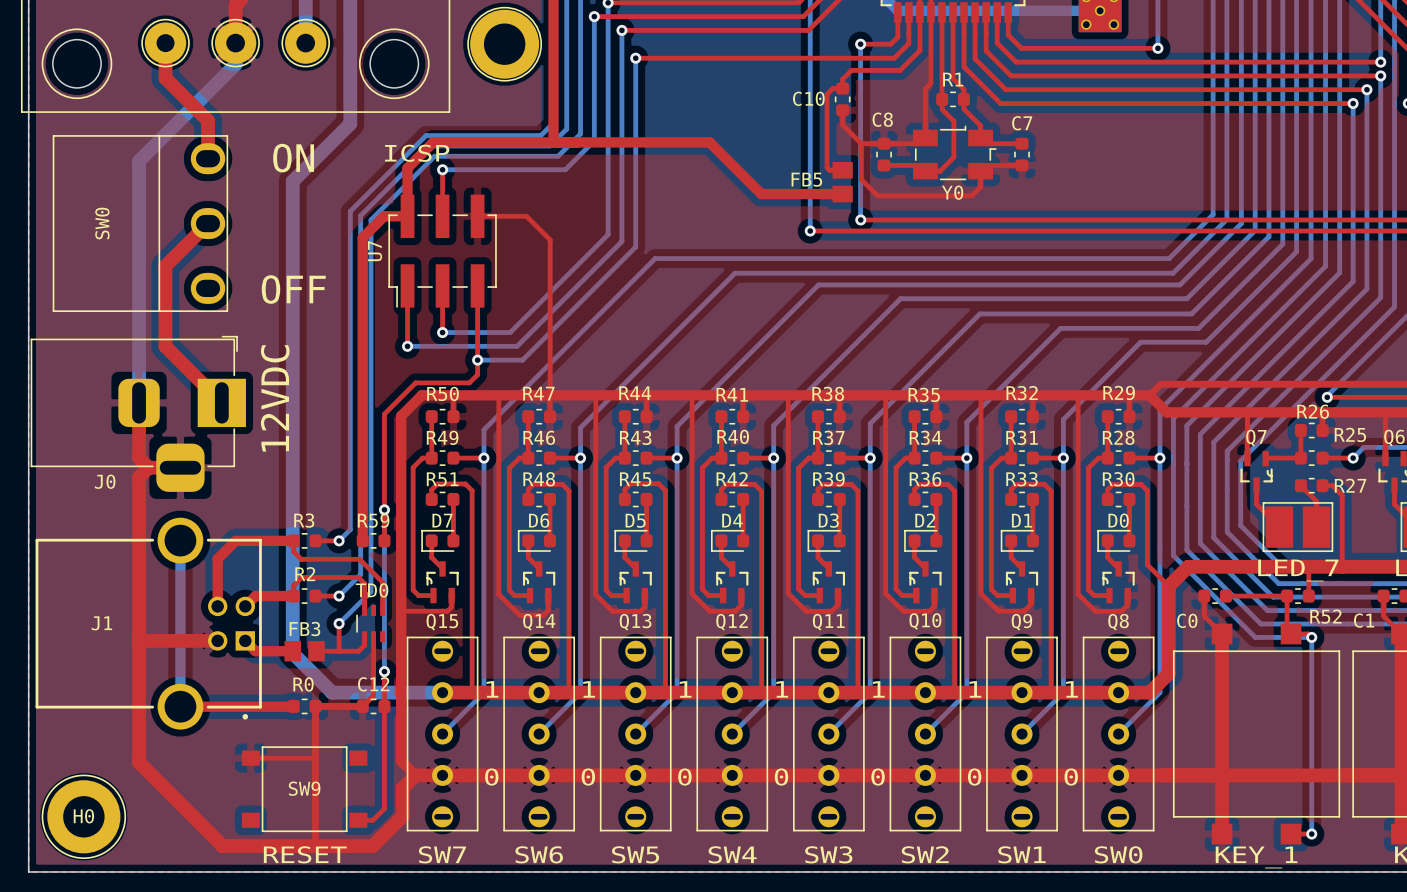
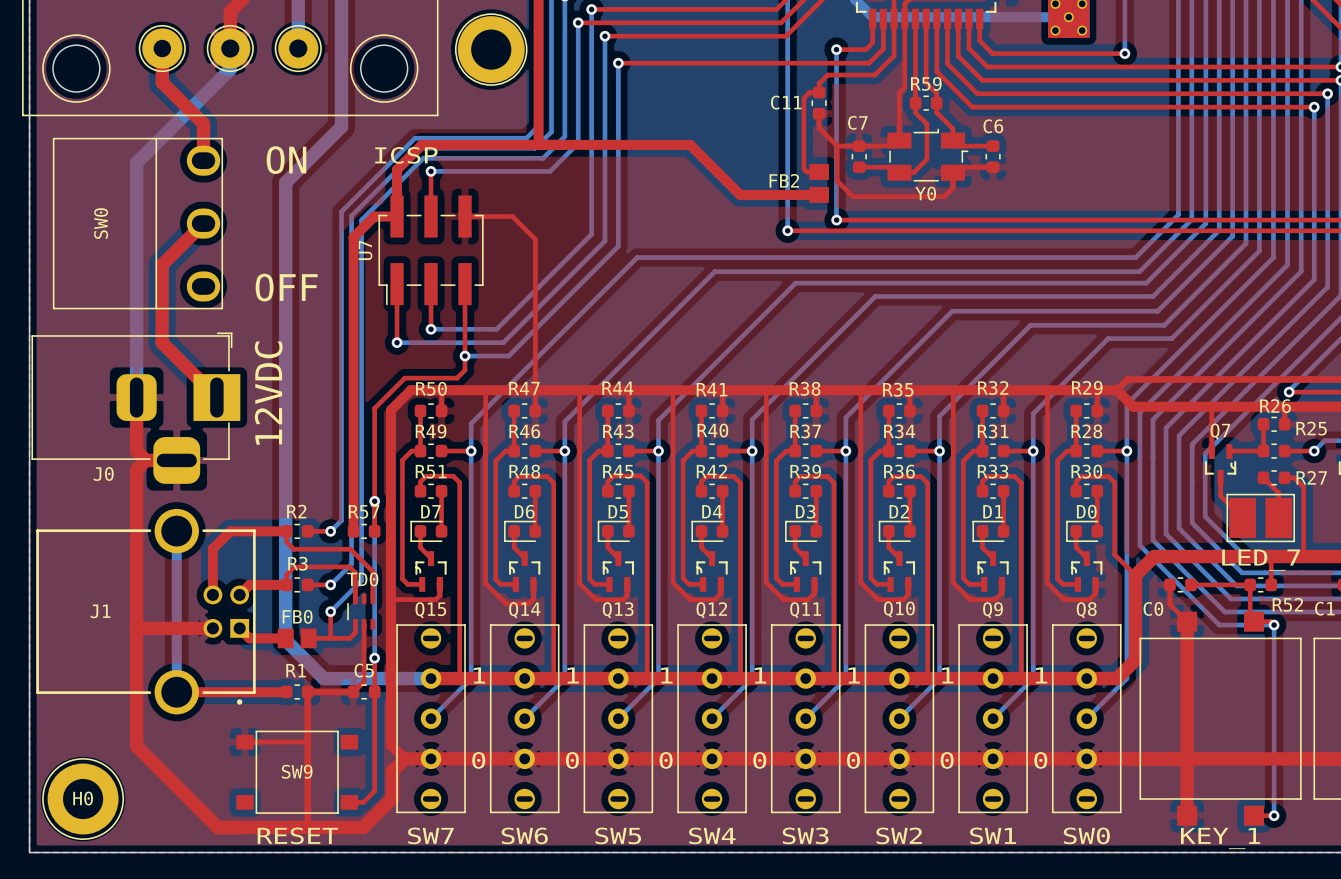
R1 name: R1 (953, 79) -> R59 (926, 83)
C10 name: C10 (808, 98) -> C11 (786, 102)
C8 name: C8 (882, 119) -> C7 (857, 122)
C7 name: C7 (1022, 123) -> C6 (993, 126)
FB5 name: FB5 (806, 179) -> FB2 (784, 180)
R3 name: R3 (304, 520) -> R2 (296, 511)
R59 name: R59 (373, 520) -> R57 (364, 511)
R2 name: R2 (305, 574) -> R3 (297, 563)
FB3 name: FB3 (304, 629) -> FB0 (297, 616)
R0 name: R0 (303, 684) -> R1 (296, 670)
C12 name: C12 (373, 684) -> C5 (364, 670)

